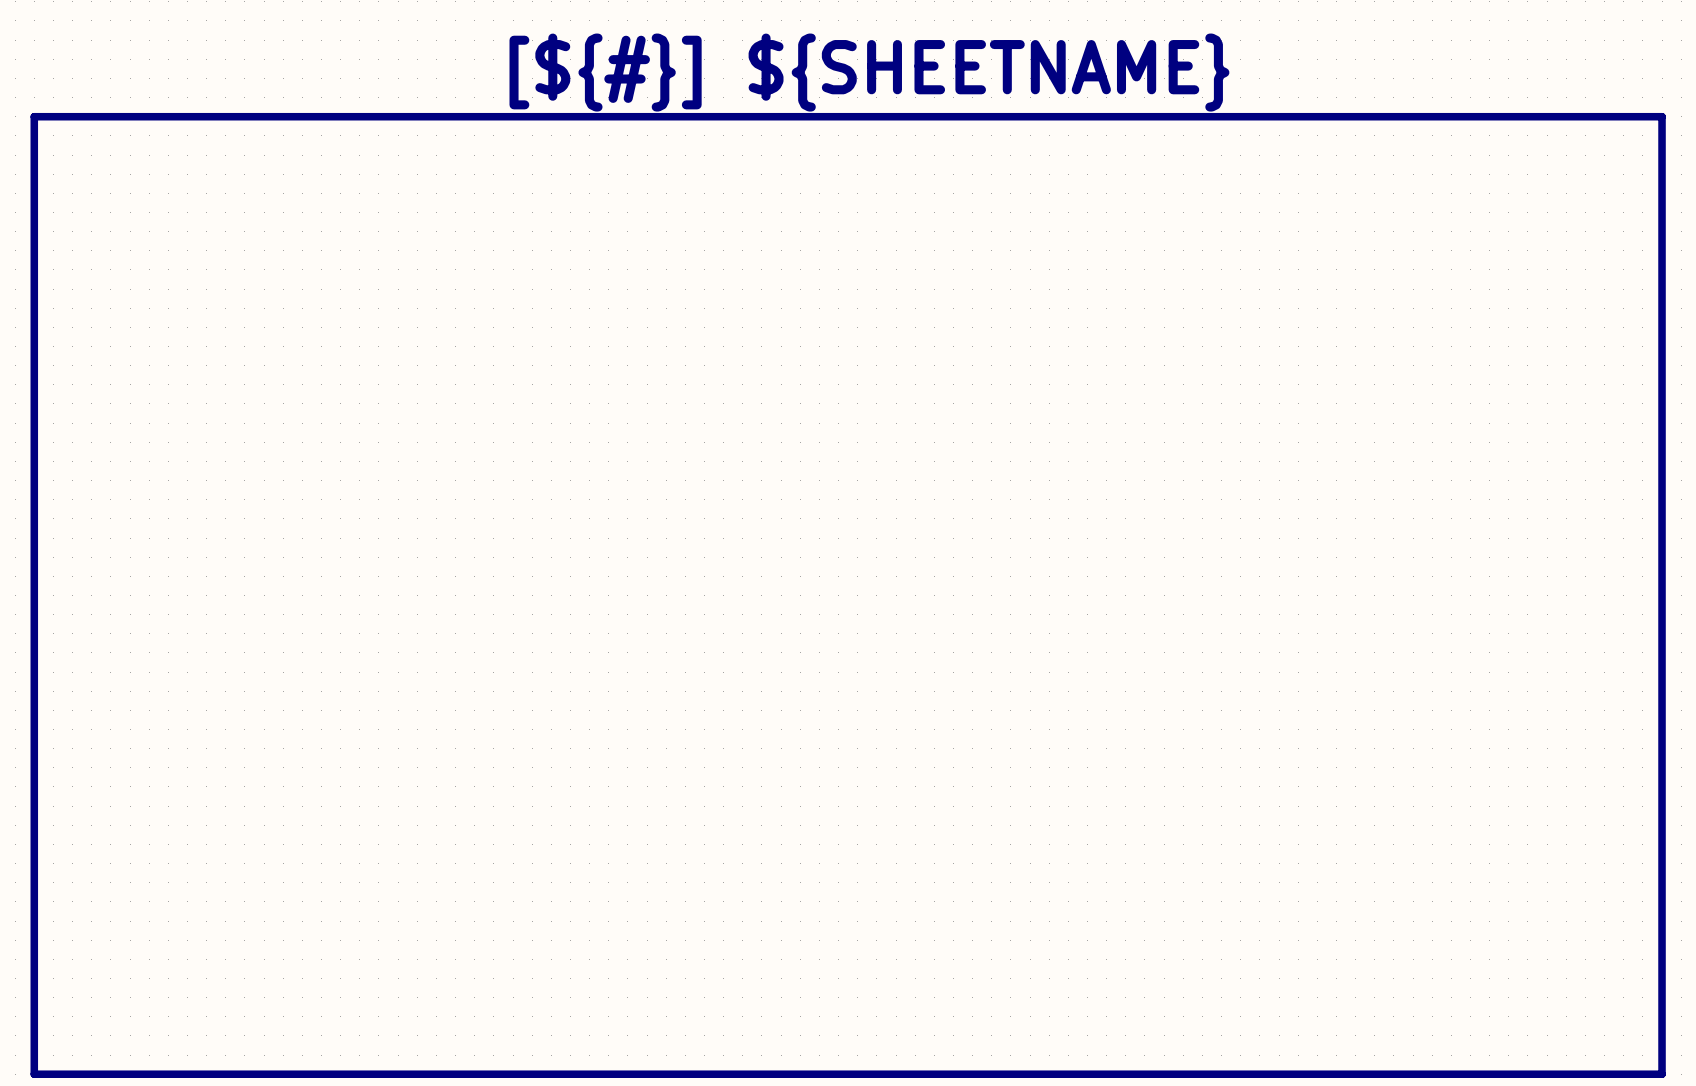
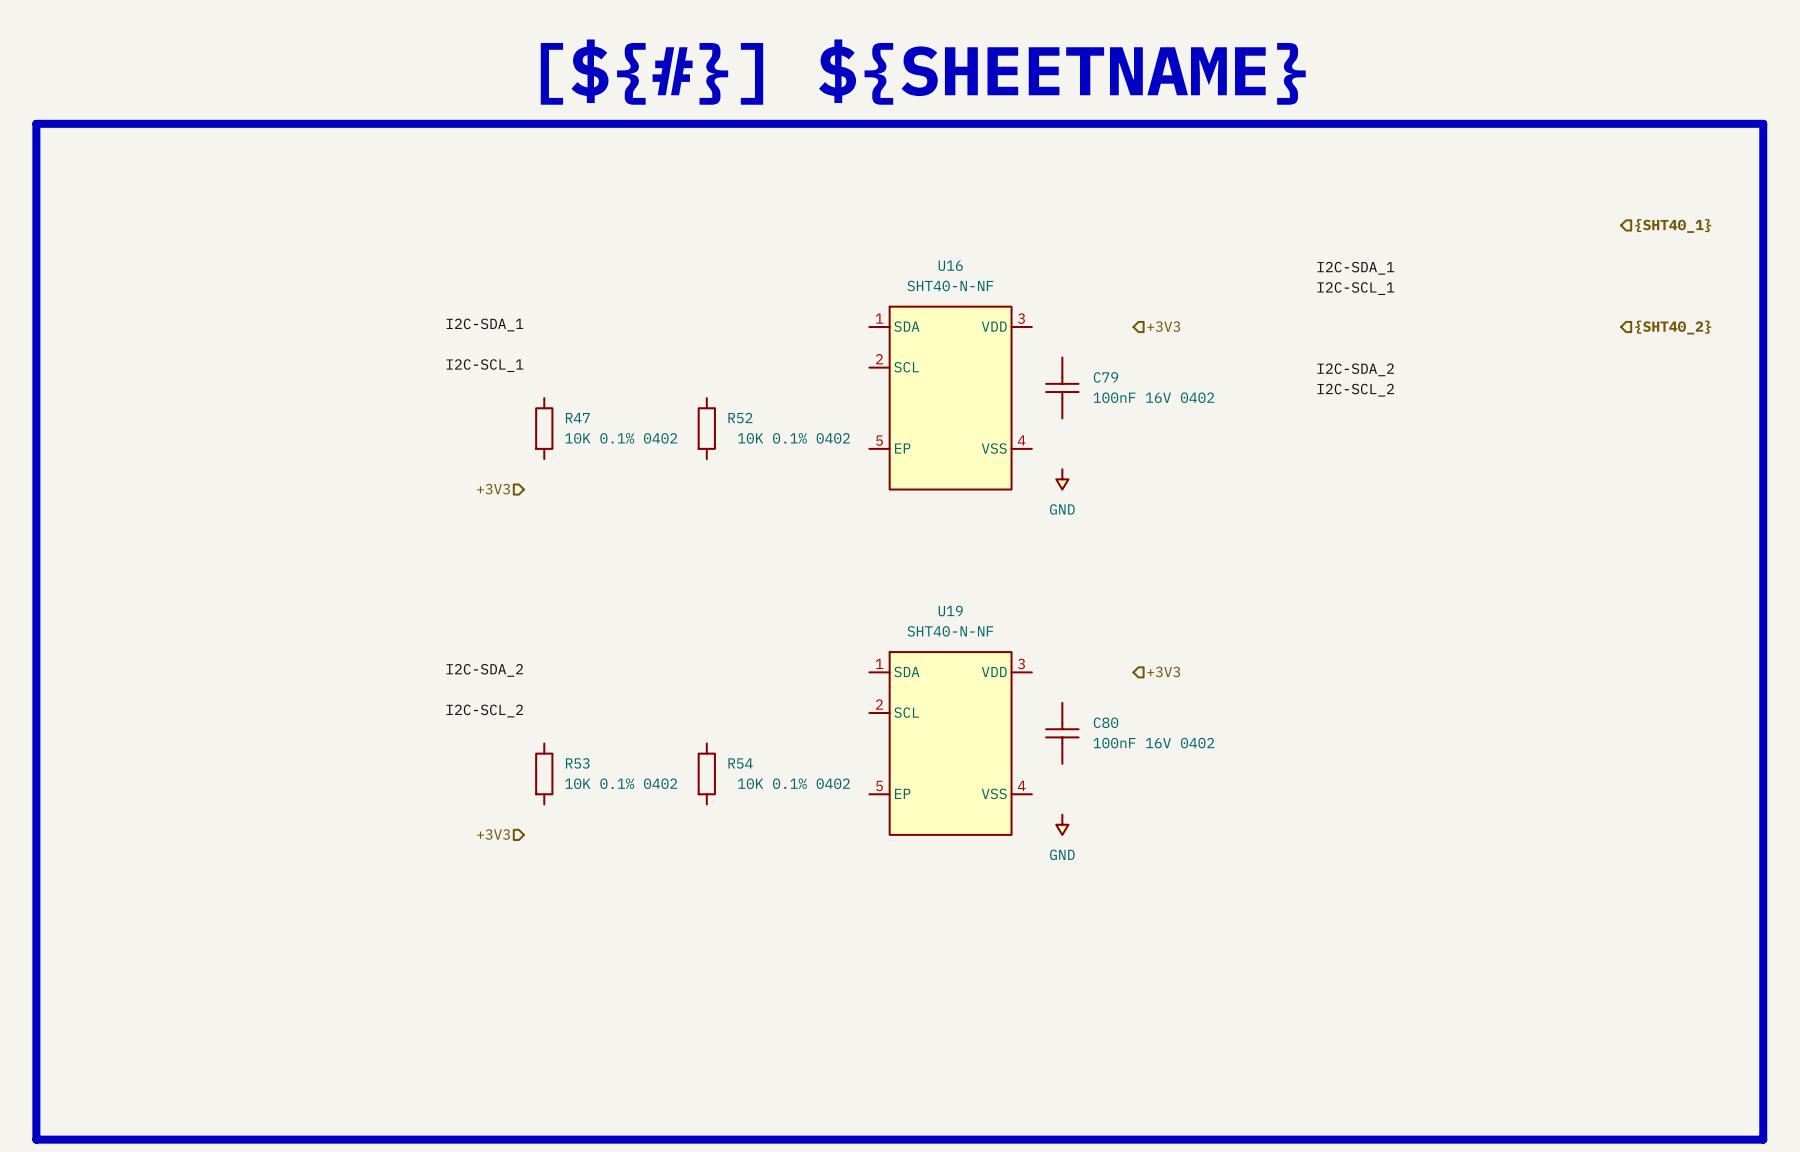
hierarchical label: none -> {SHT40_1} (1673, 225)
label: none -> I2C-SDA_1 (1355, 268)
label: none -> I2C-SCL_1 (1355, 288)
label: none -> I2C-SDA_1 (484, 325)
hierarchical label: none -> +3V3 (1163, 326)
hierarchical label: none -> {SHT40_2} (1673, 327)
label: none -> I2C-SCL_1 (484, 365)
label: none -> I2C-SDA_2 (1355, 369)
C79: none -> 100nF 16V 0402 (1062, 387)
label: none -> I2C-SCL_2 (1355, 390)
U16: none -> SHT40-N-NF (950, 398)
R47: none -> 10K 0.1% 0402 (544, 428)
R52: none -> 10K 0.1% 0402 (706, 428)
power symbol: none -> GND (1062, 479)
hierarchical label: none -> +3V3 (493, 489)
label: none -> I2C-SDA_2 (484, 670)
hierarchical label: none -> +3V3 (1163, 671)
label: none -> I2C-SCL_2 (484, 711)
C80: none -> 100nF 16V 0402 (1062, 733)
U19: none -> SHT40-N-NF (950, 743)
R53: none -> 10K 0.1% 0402 (544, 773)
R54: none -> 10K 0.1% 0402 (706, 773)
power symbol: none -> GND (1062, 824)
hierarchical label: none -> +3V3 (493, 834)

